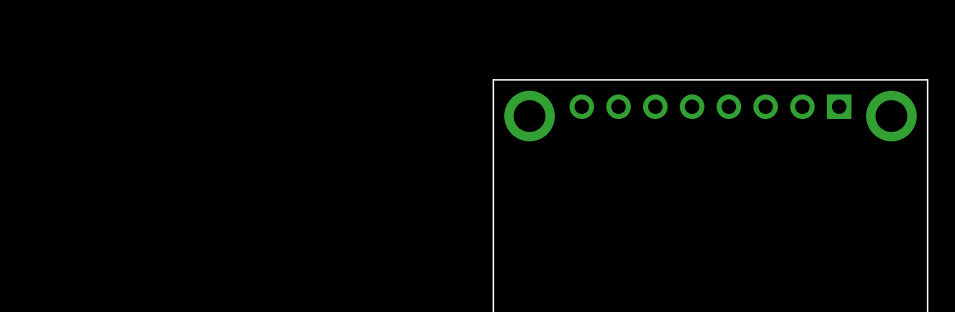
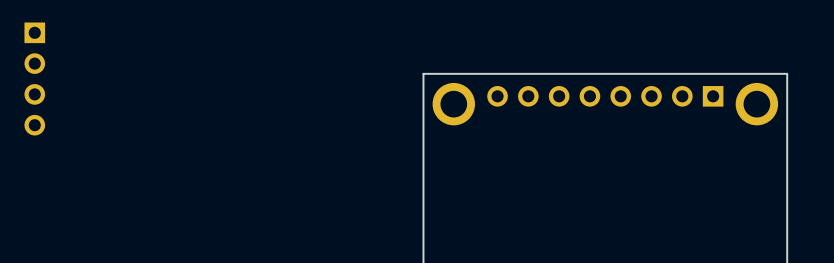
part: none -> (34, 79)

